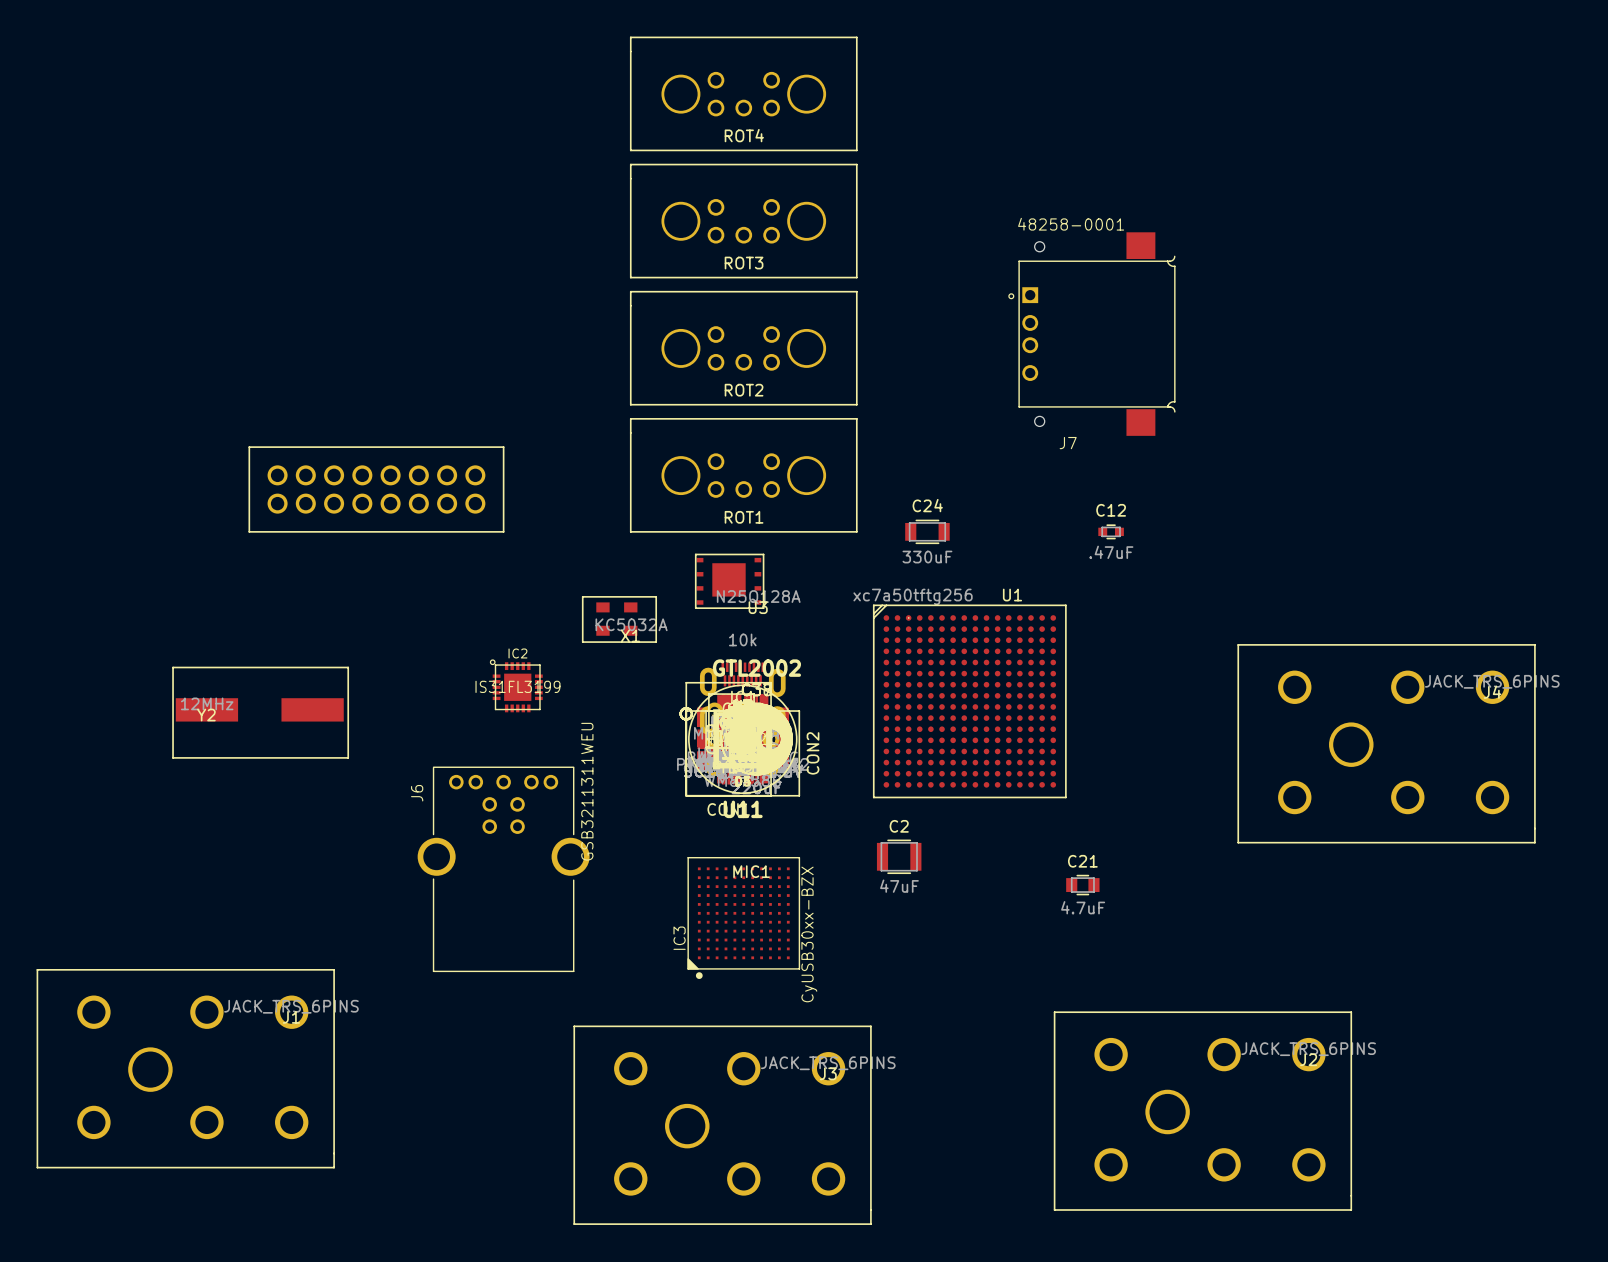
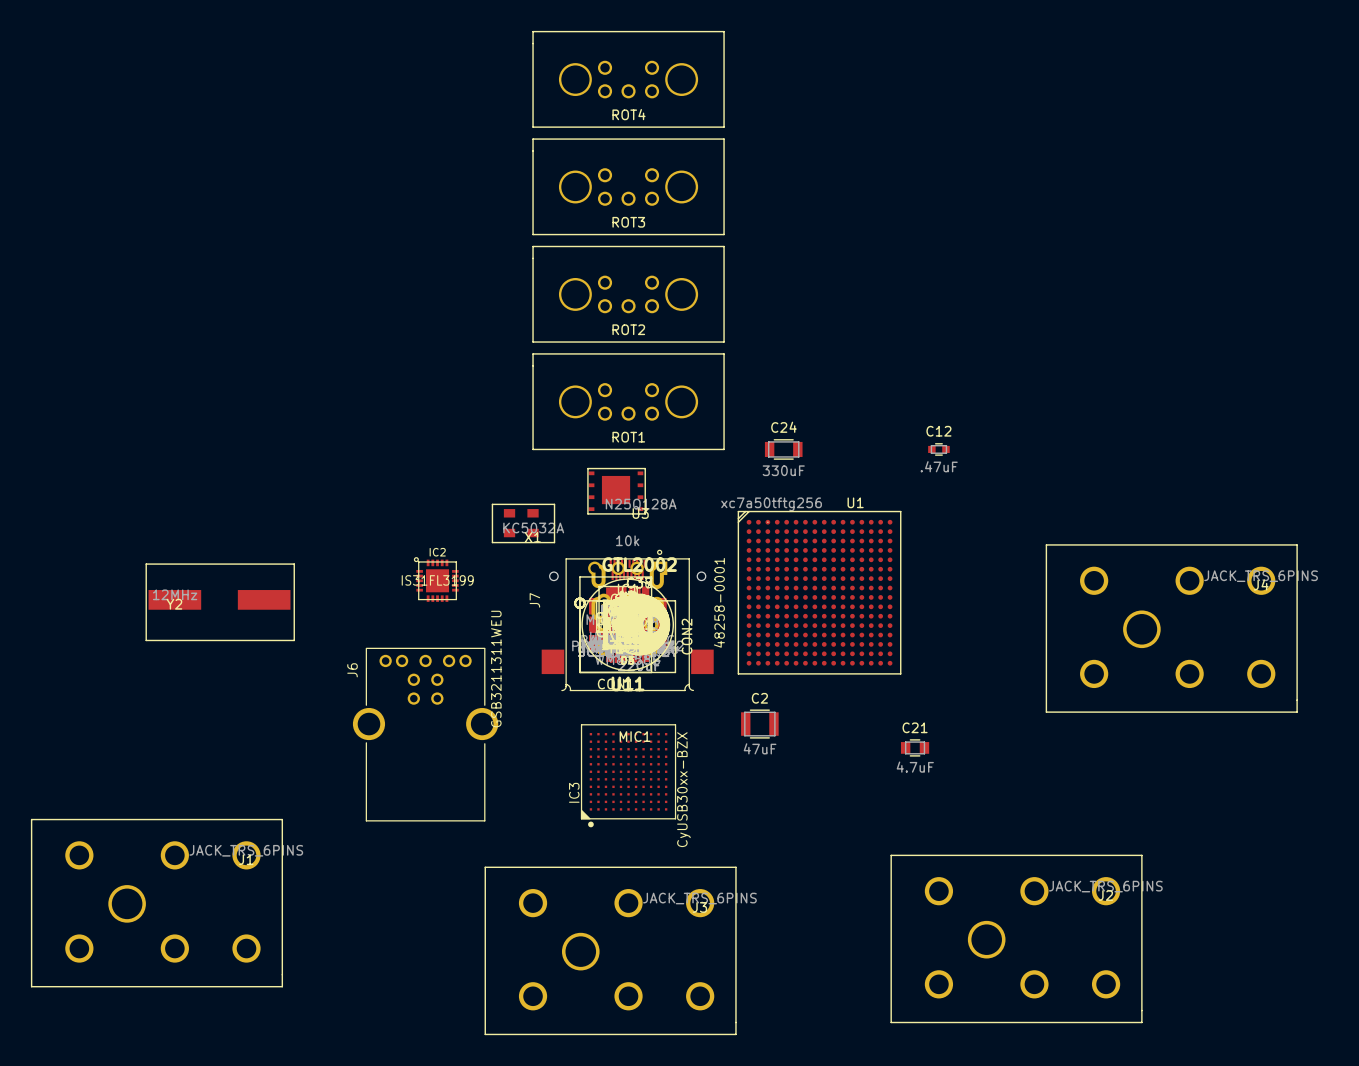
J7 rotation: 0° (1092, 334) -> 90° clockwise (627, 620)
J7 position: (1092, 334) -> (627, 620)
part: (376, 489) -> none

